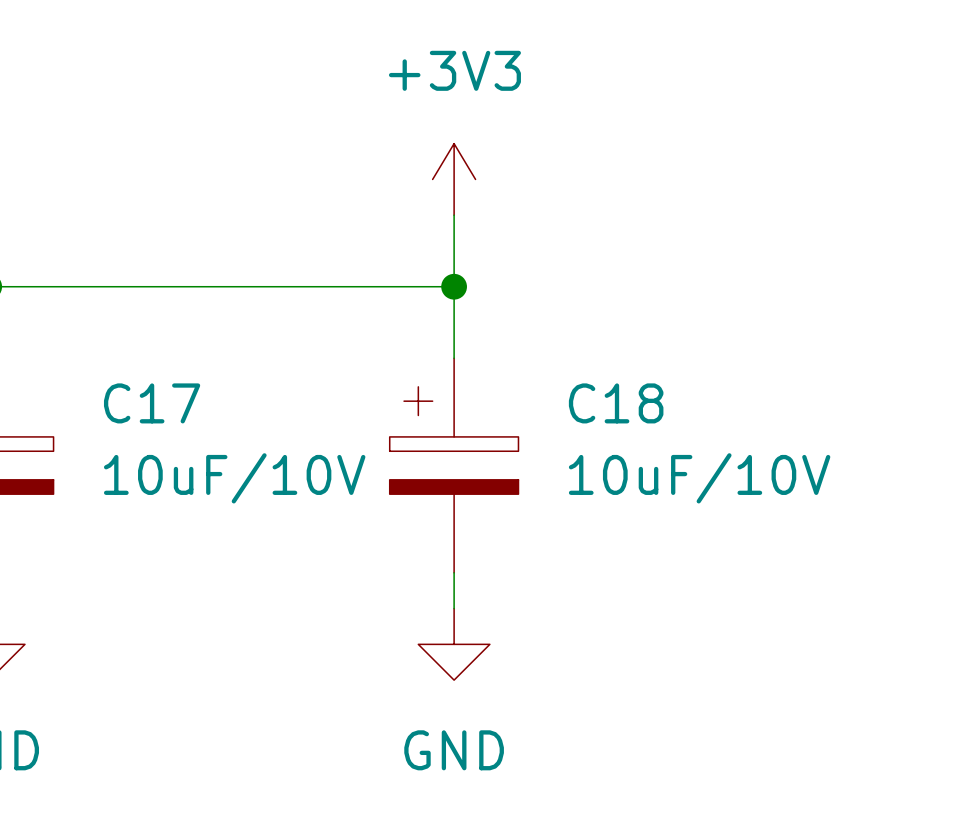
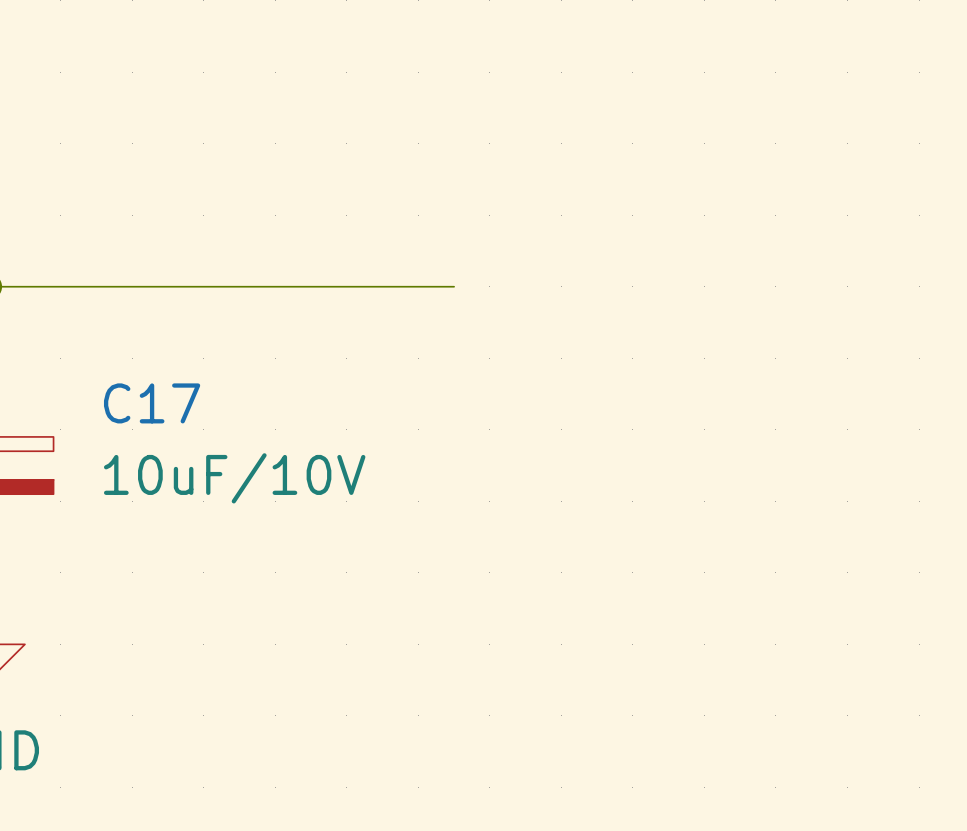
power symbol: +3V3 (454, 179) -> none
wire: (454, 215) (454, 358) -> none
junction: (454, 286) -> none
C18: 10uF/10V (454, 465) -> none
wire: (454, 572) (454, 608) -> none
power symbol: GND (454, 644) -> none

